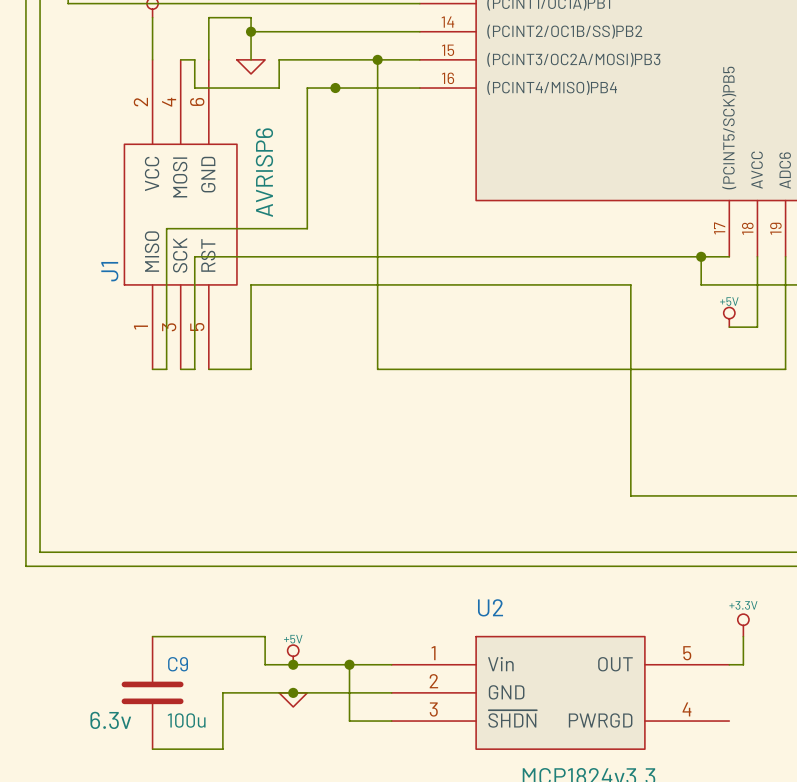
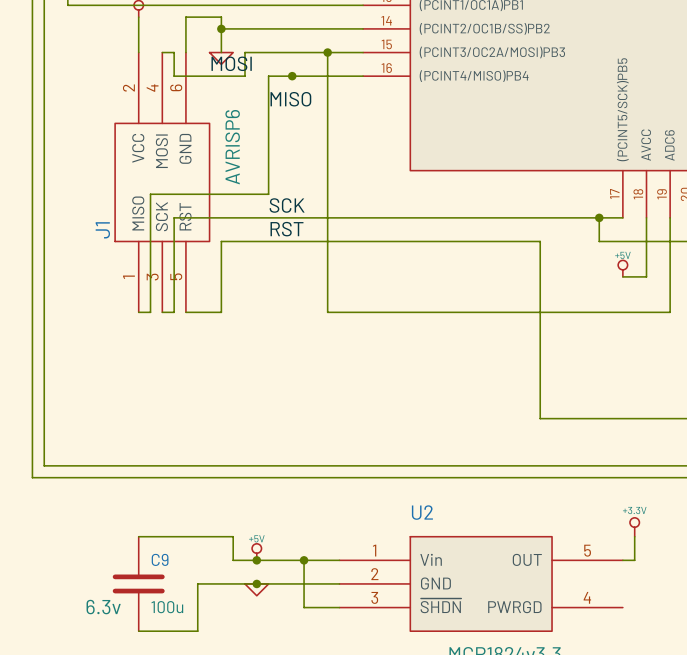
label: none -> MOSI (231, 63)
label: none -> MISO (290, 99)
label: none -> SCK (287, 205)
label: none -> RST (286, 229)

